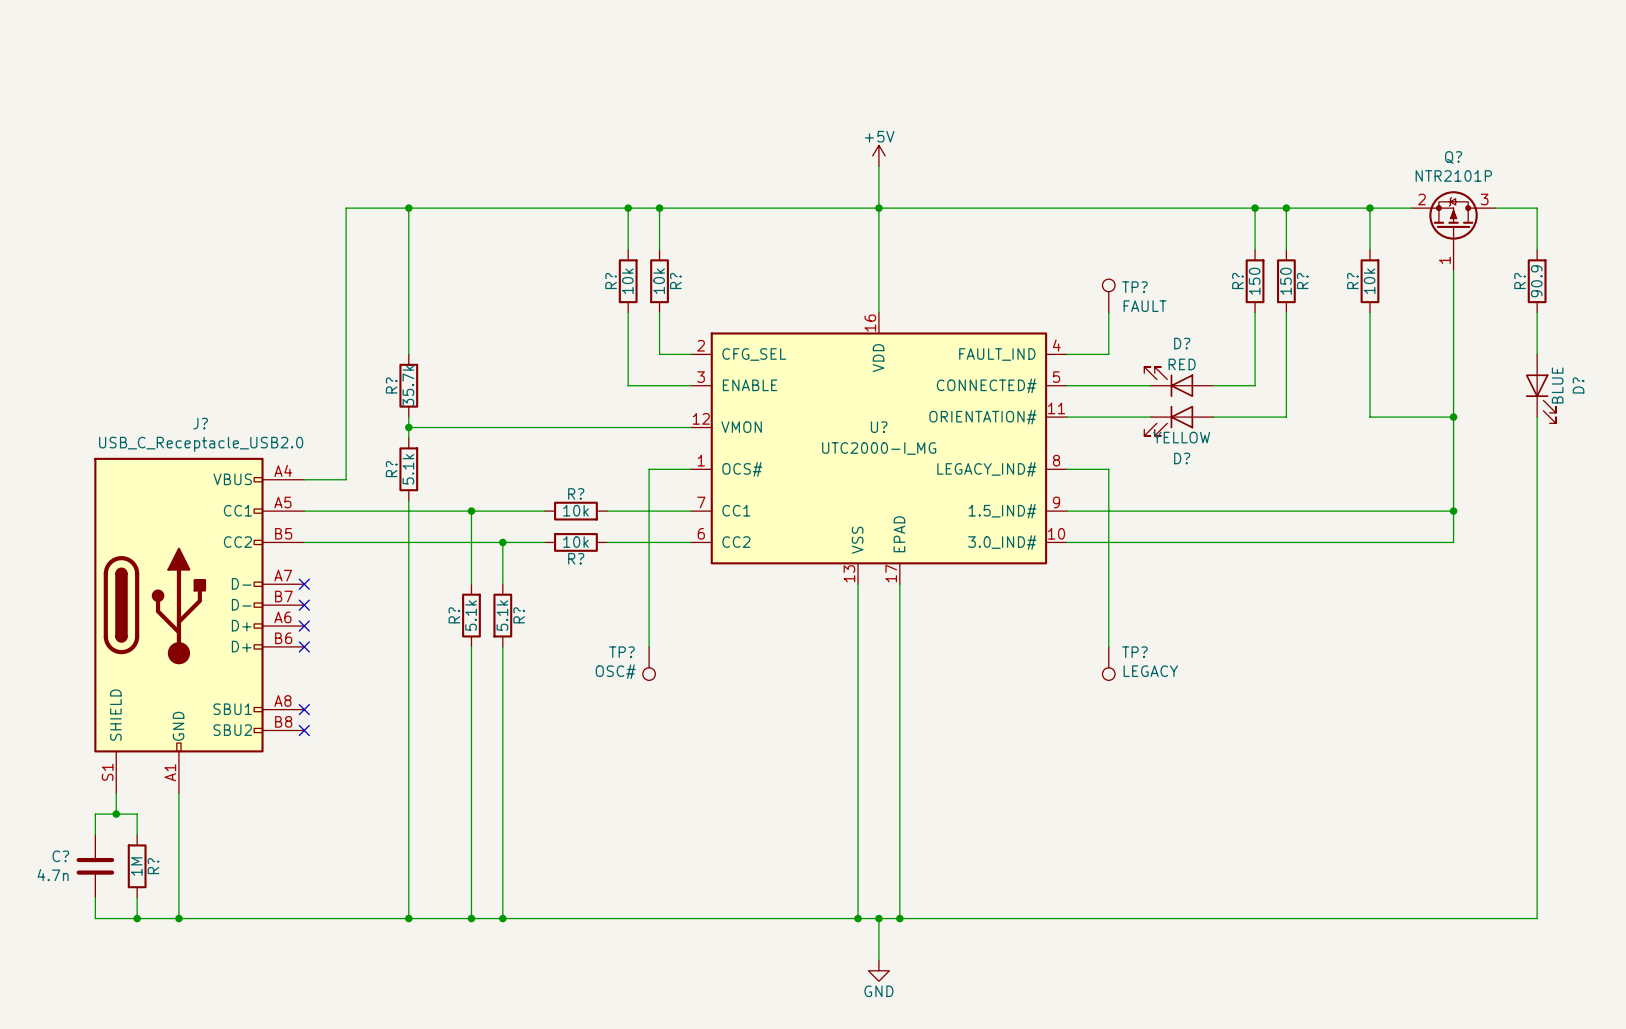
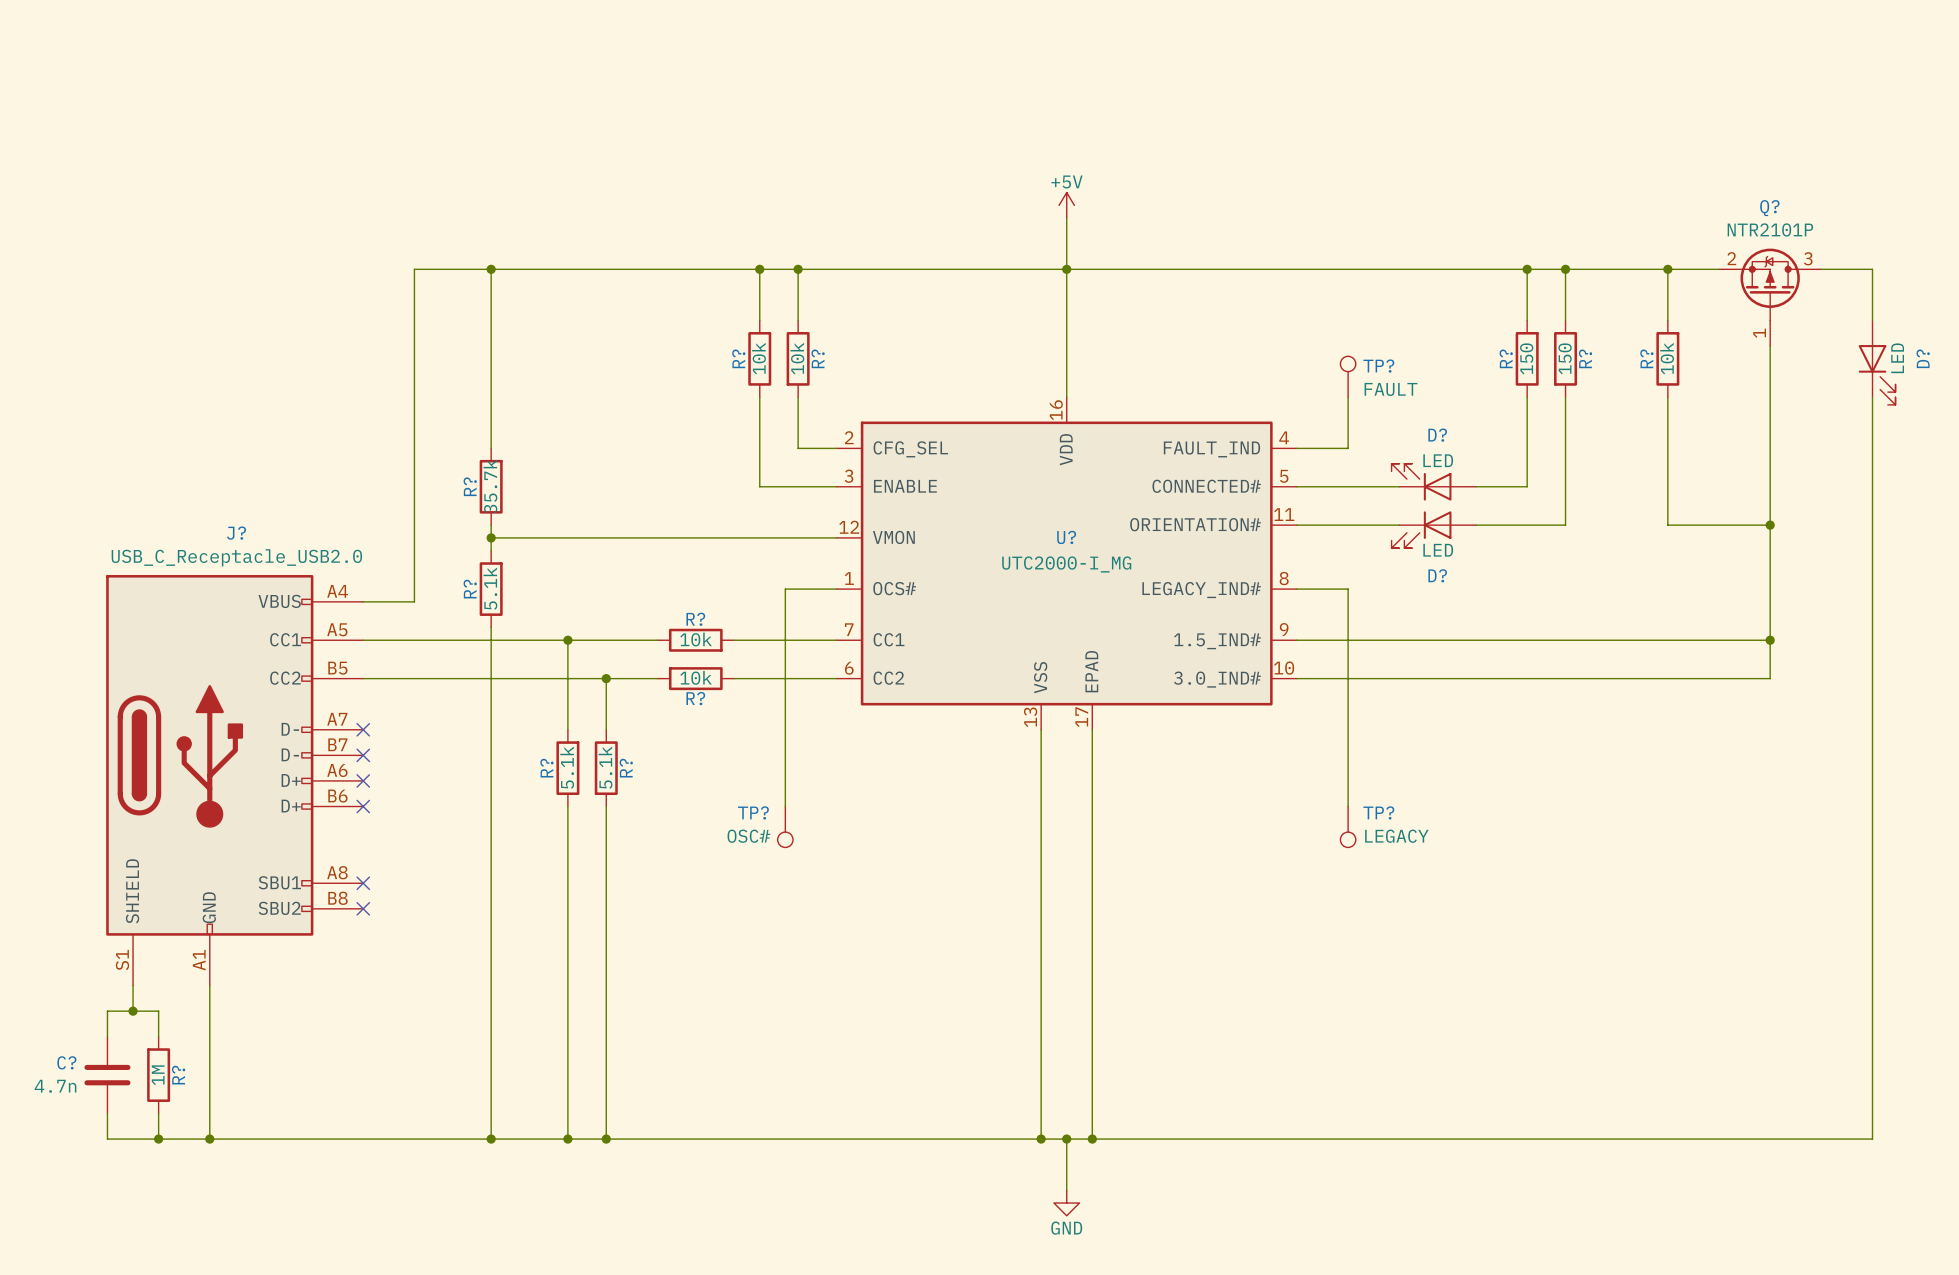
R?: 90.9 (1537, 281) -> none
D?: none -> LED (1877, 362)
D? value: RED (1182, 364) -> LED (1438, 460)
D?: BLUE (1540, 388) -> none
D? value: YELLOW (1181, 437) -> LED (1438, 550)

